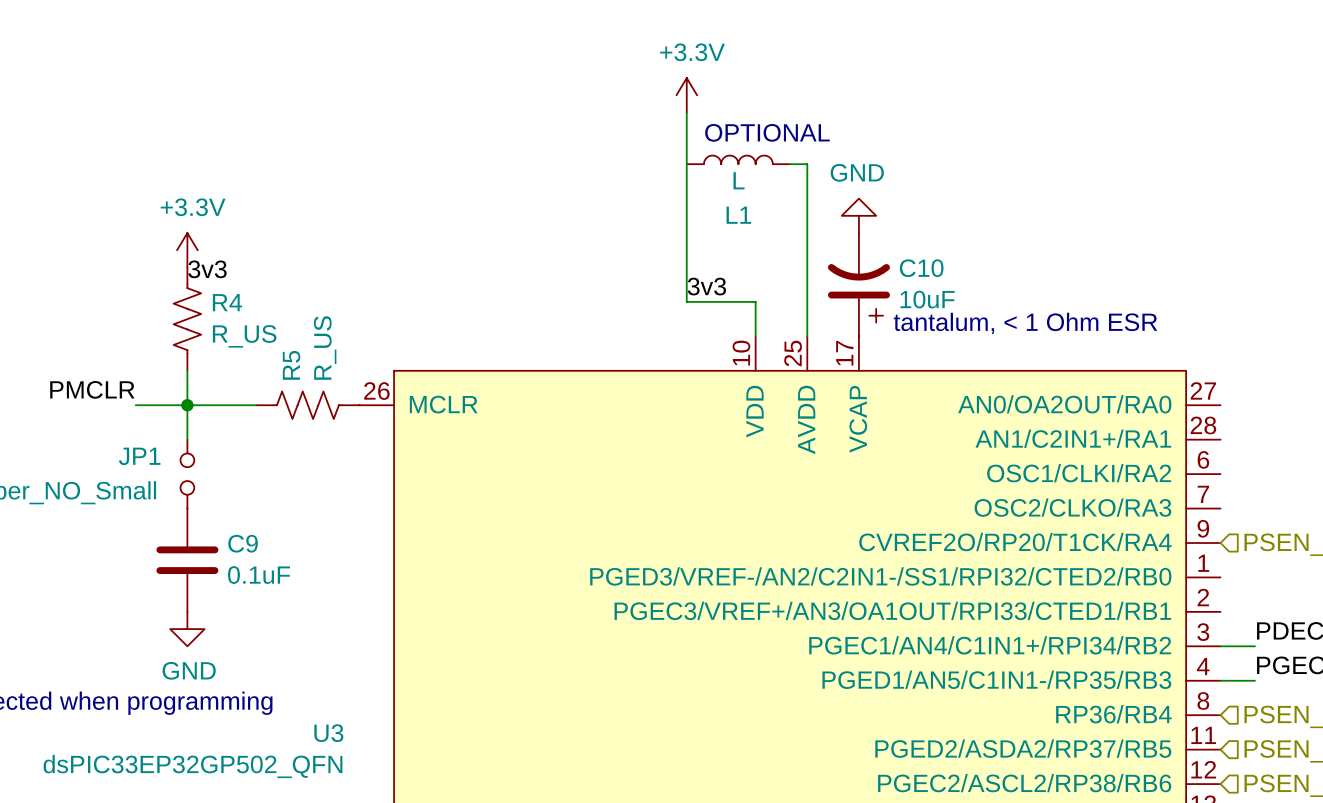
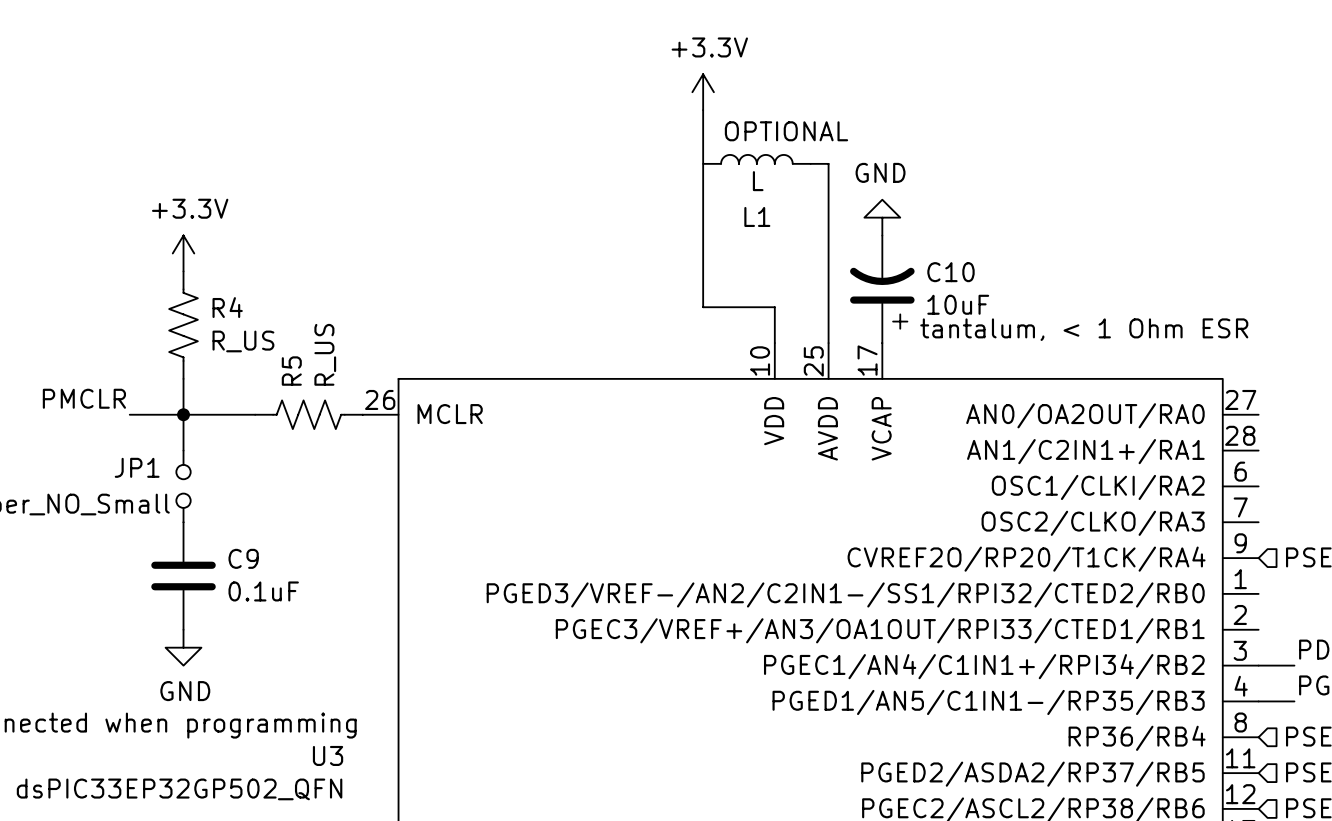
label: 3v3 (207, 269) -> none
label: 3v3 (706, 286) -> none

